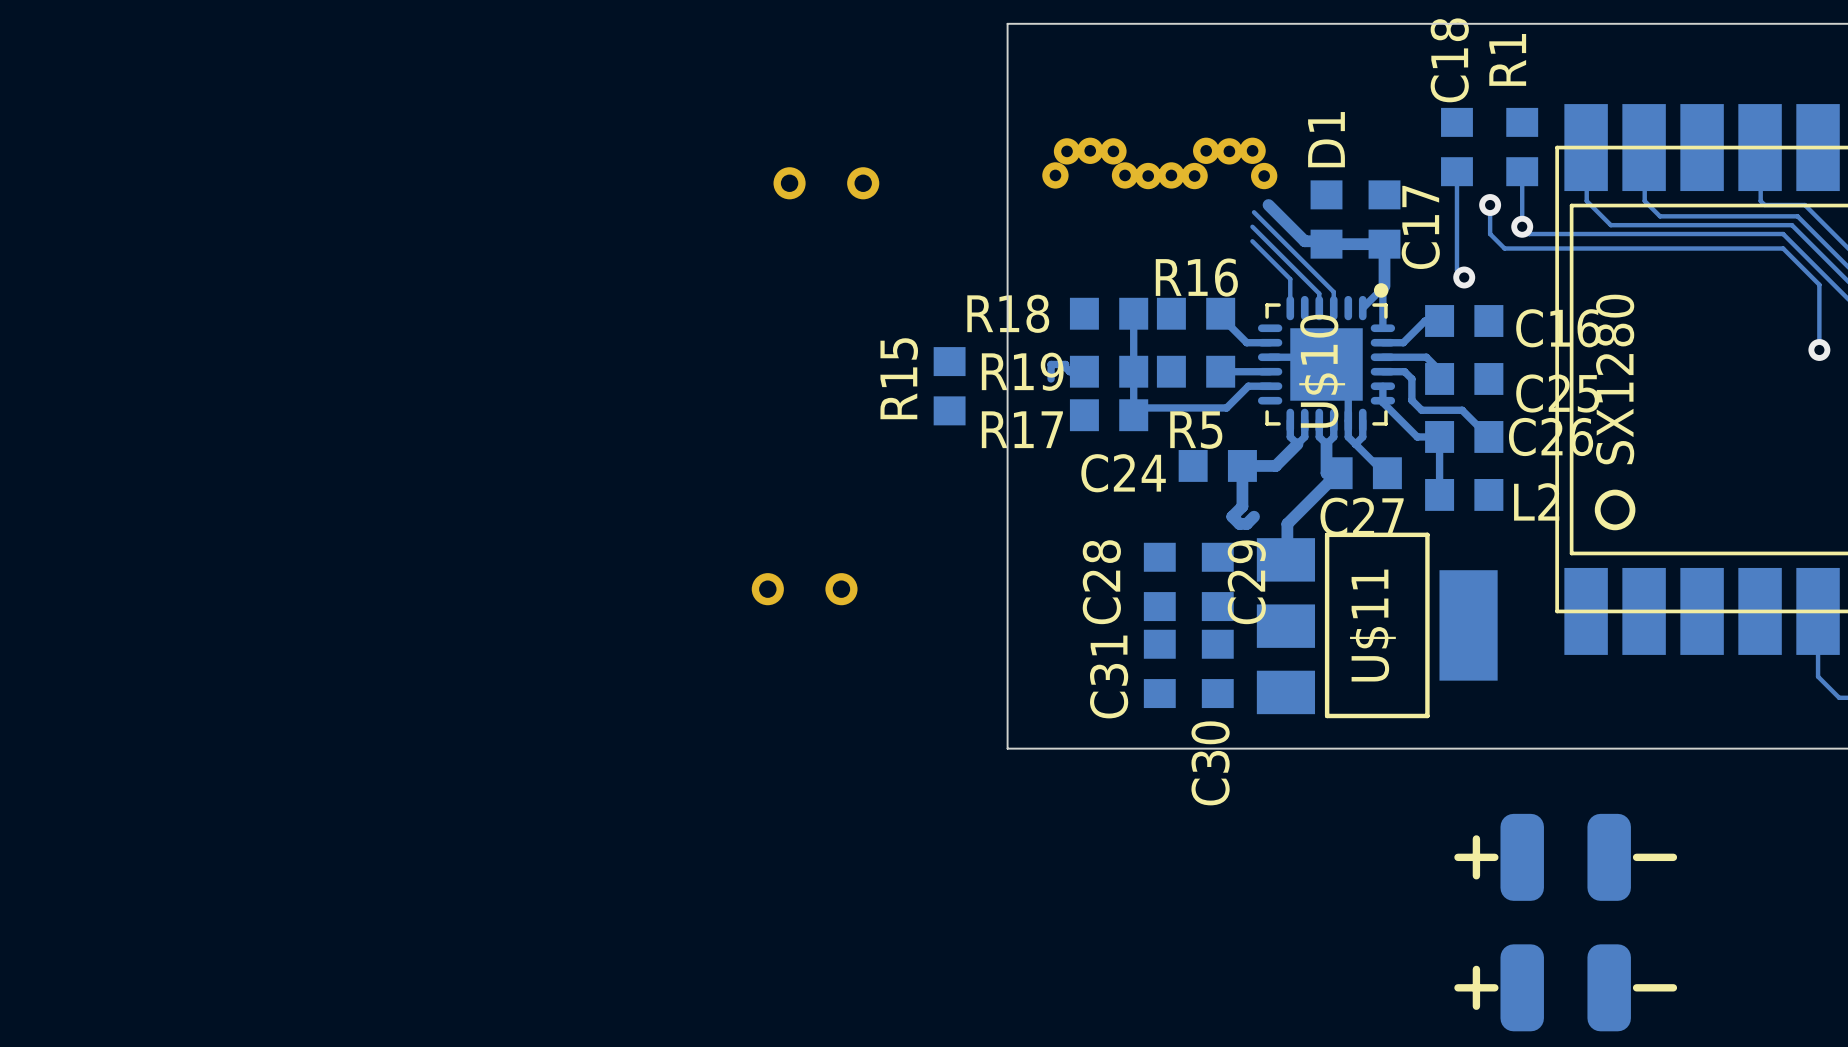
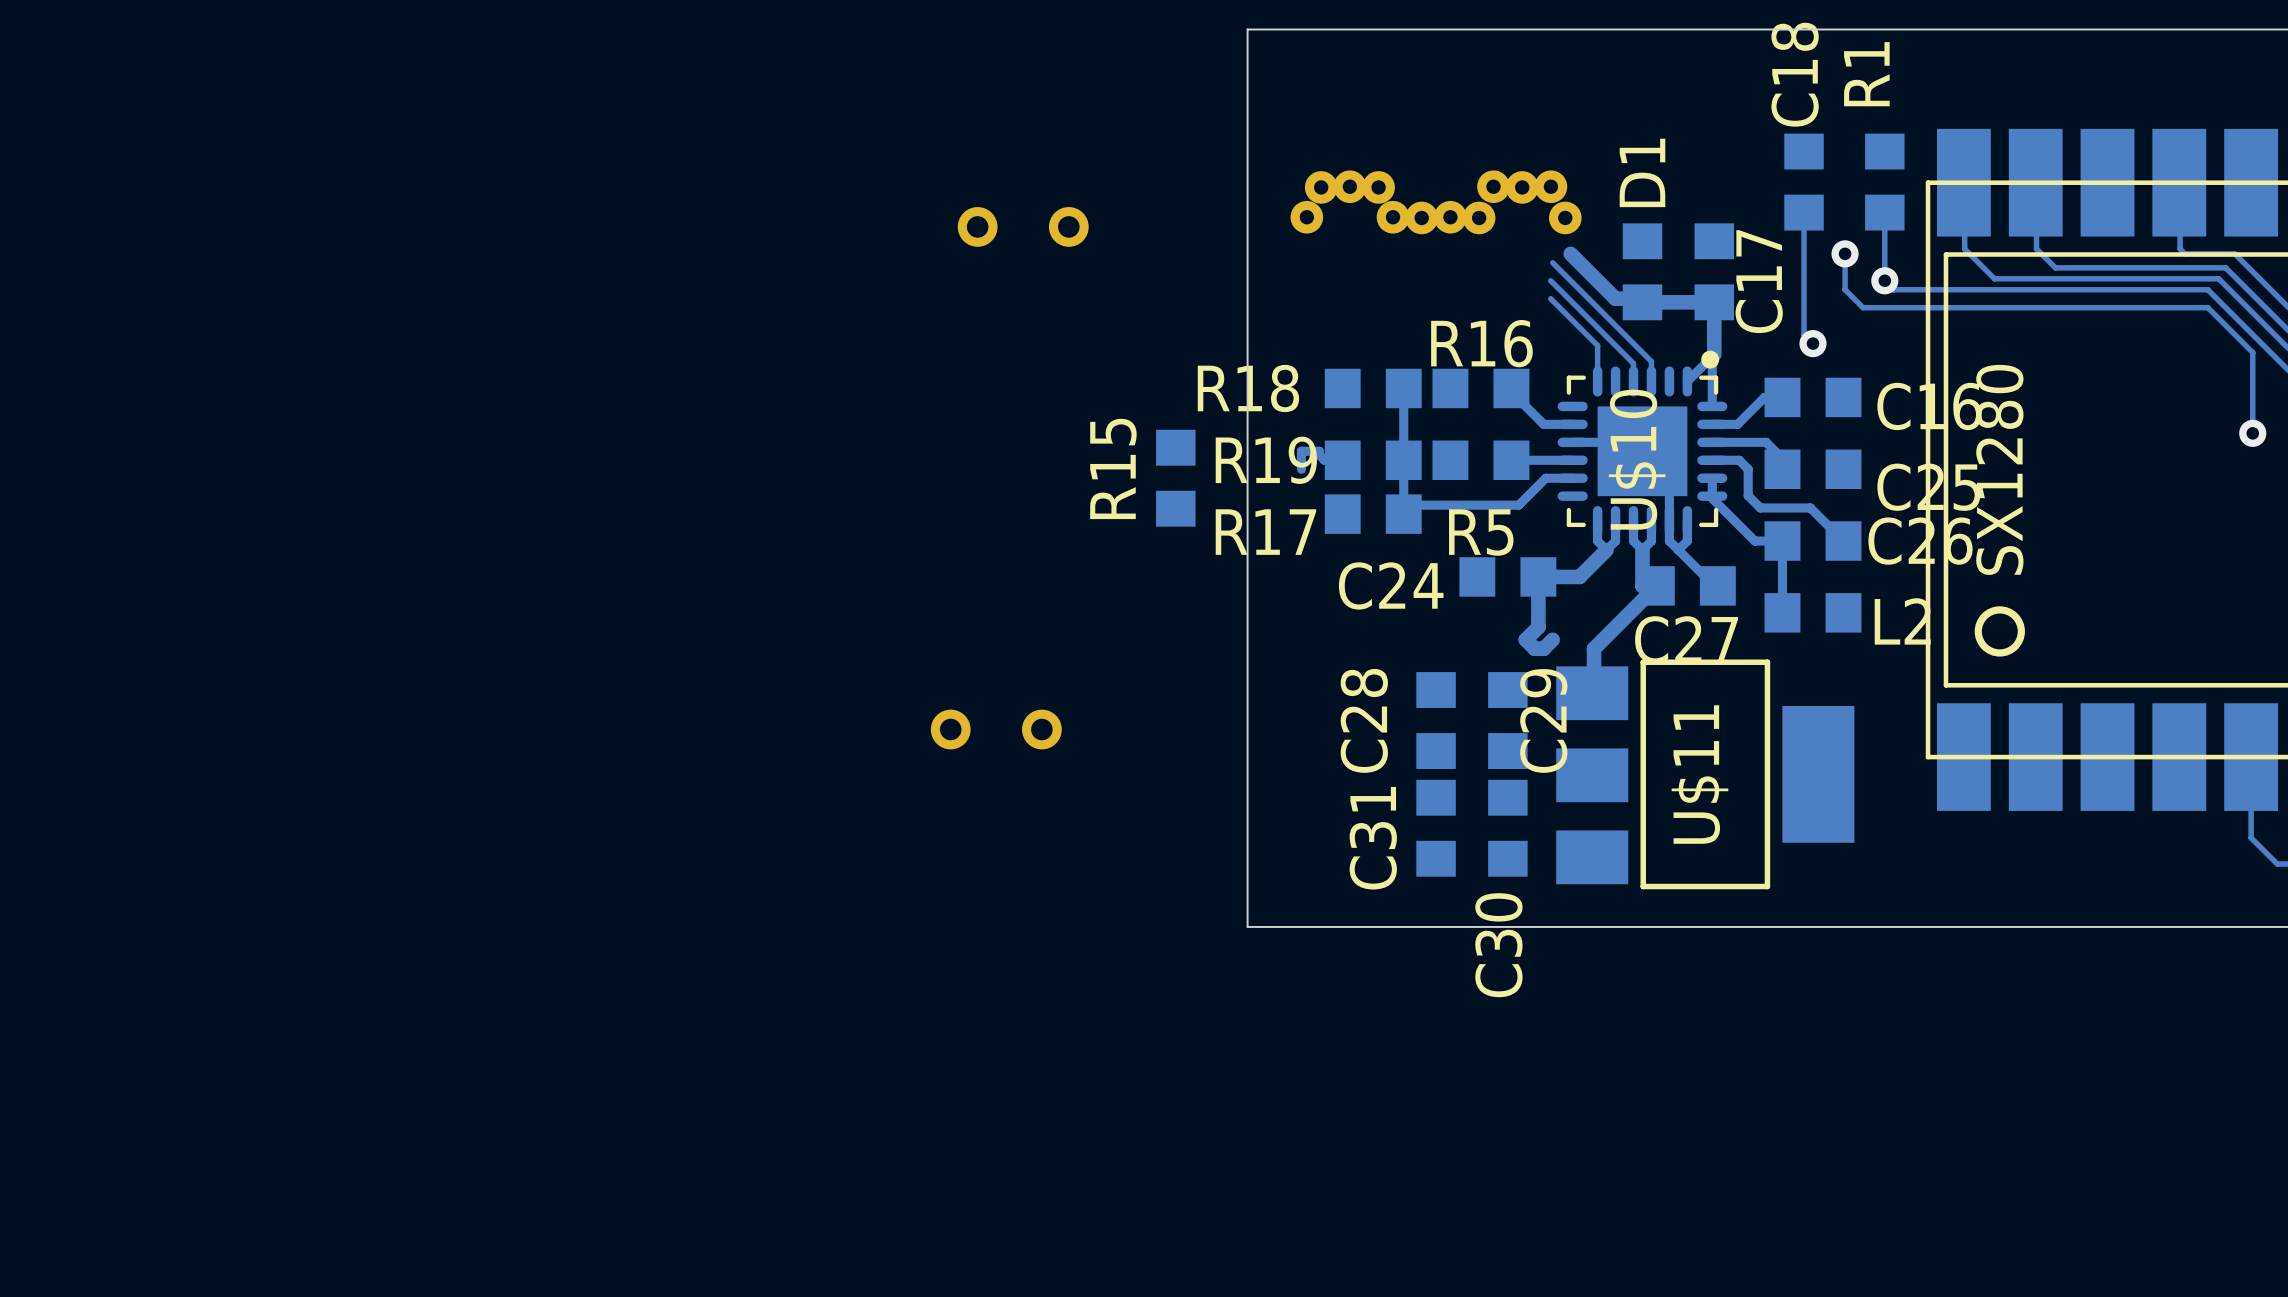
part: (1565, 857) -> none
part: (1565, 987) -> none

